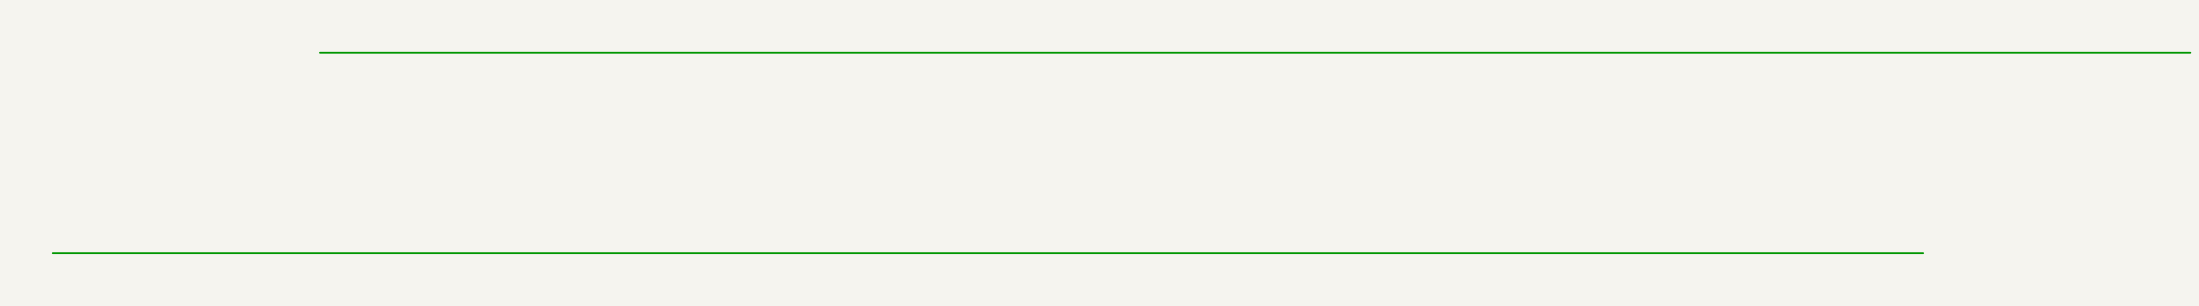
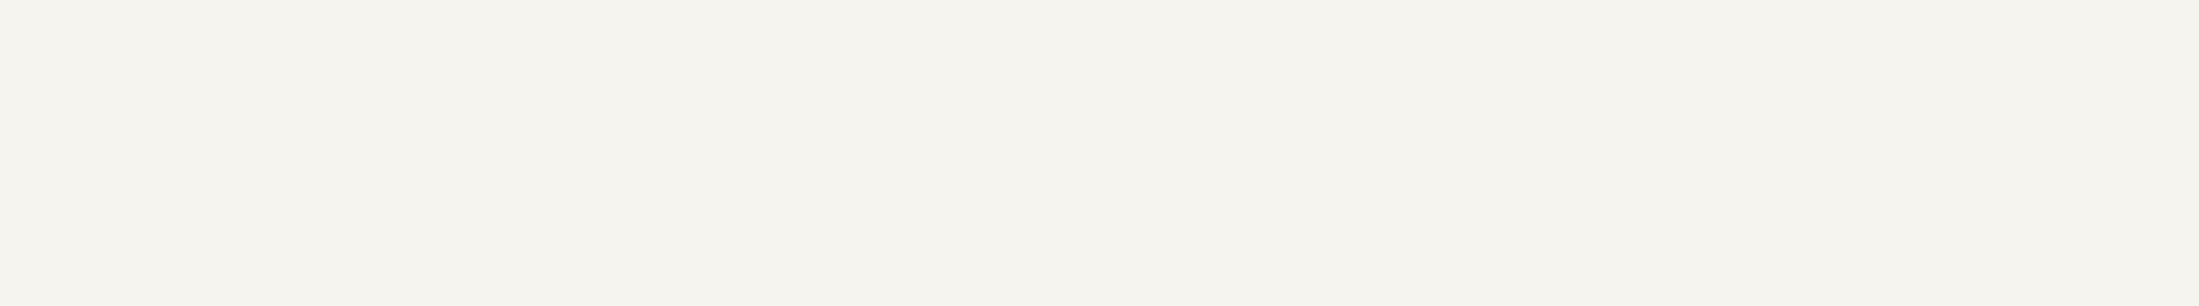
wire: (319, 52) (2190, 52) -> none
wire: (52, 253) (1923, 253) -> none

